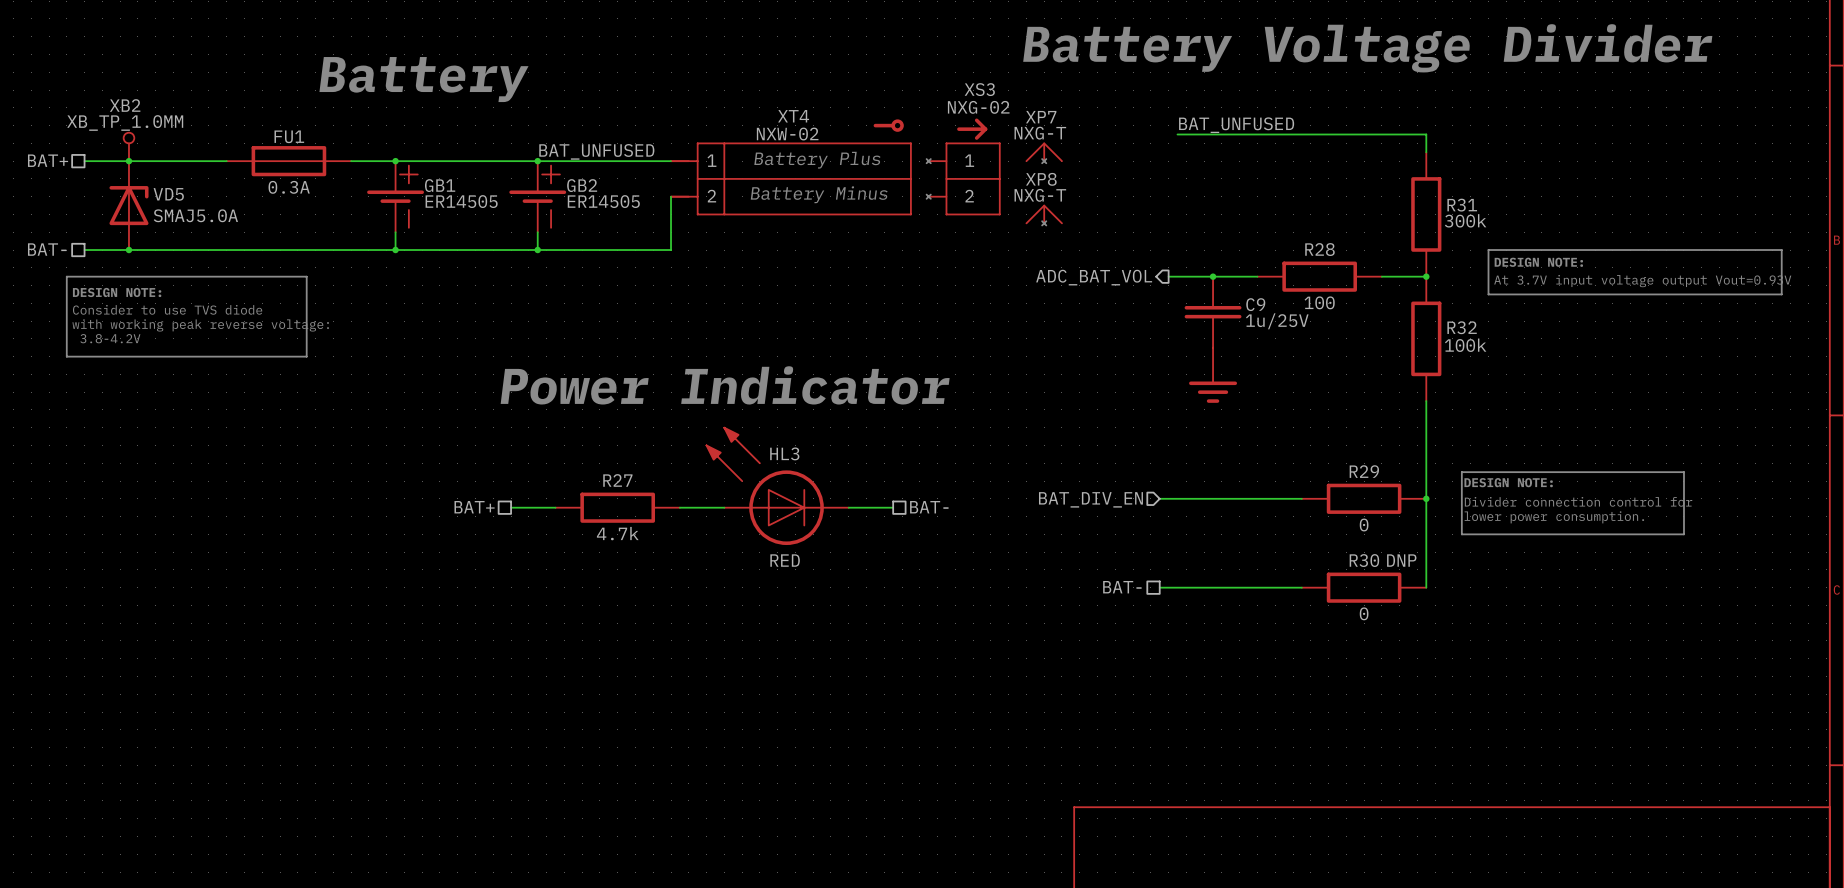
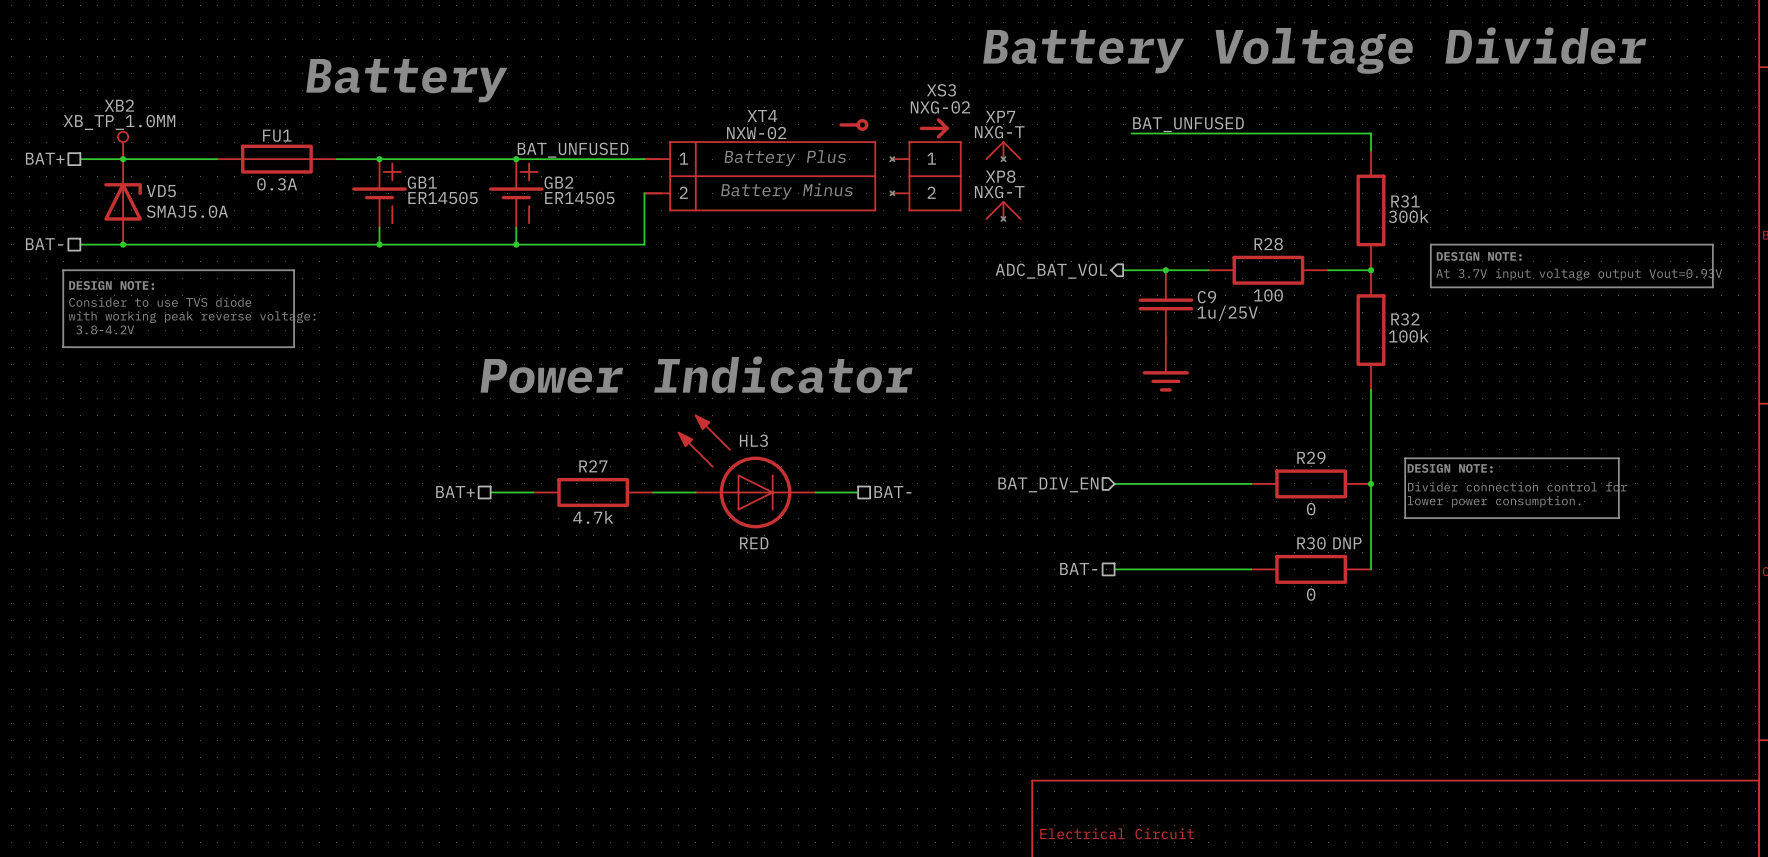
title block: none -> Electrical Circuit (1117, 833)

